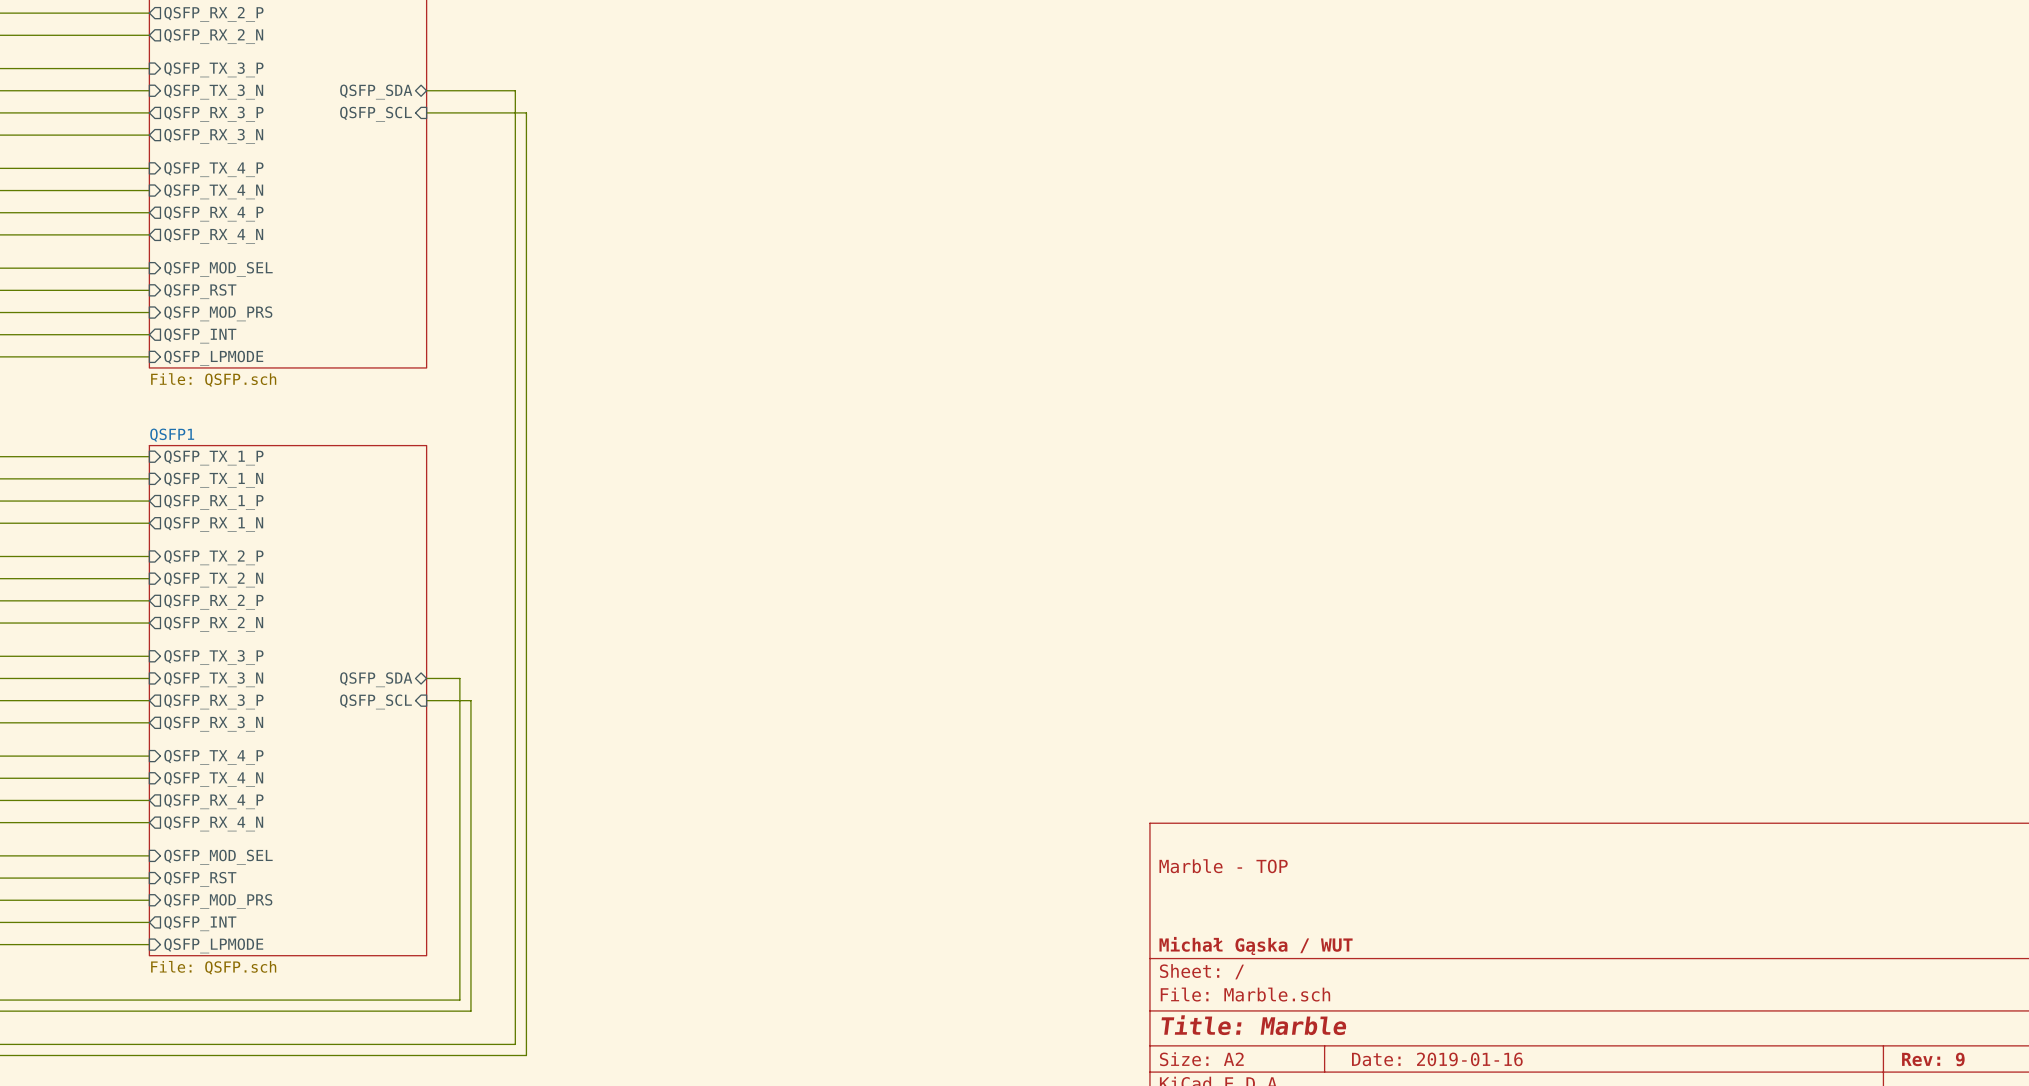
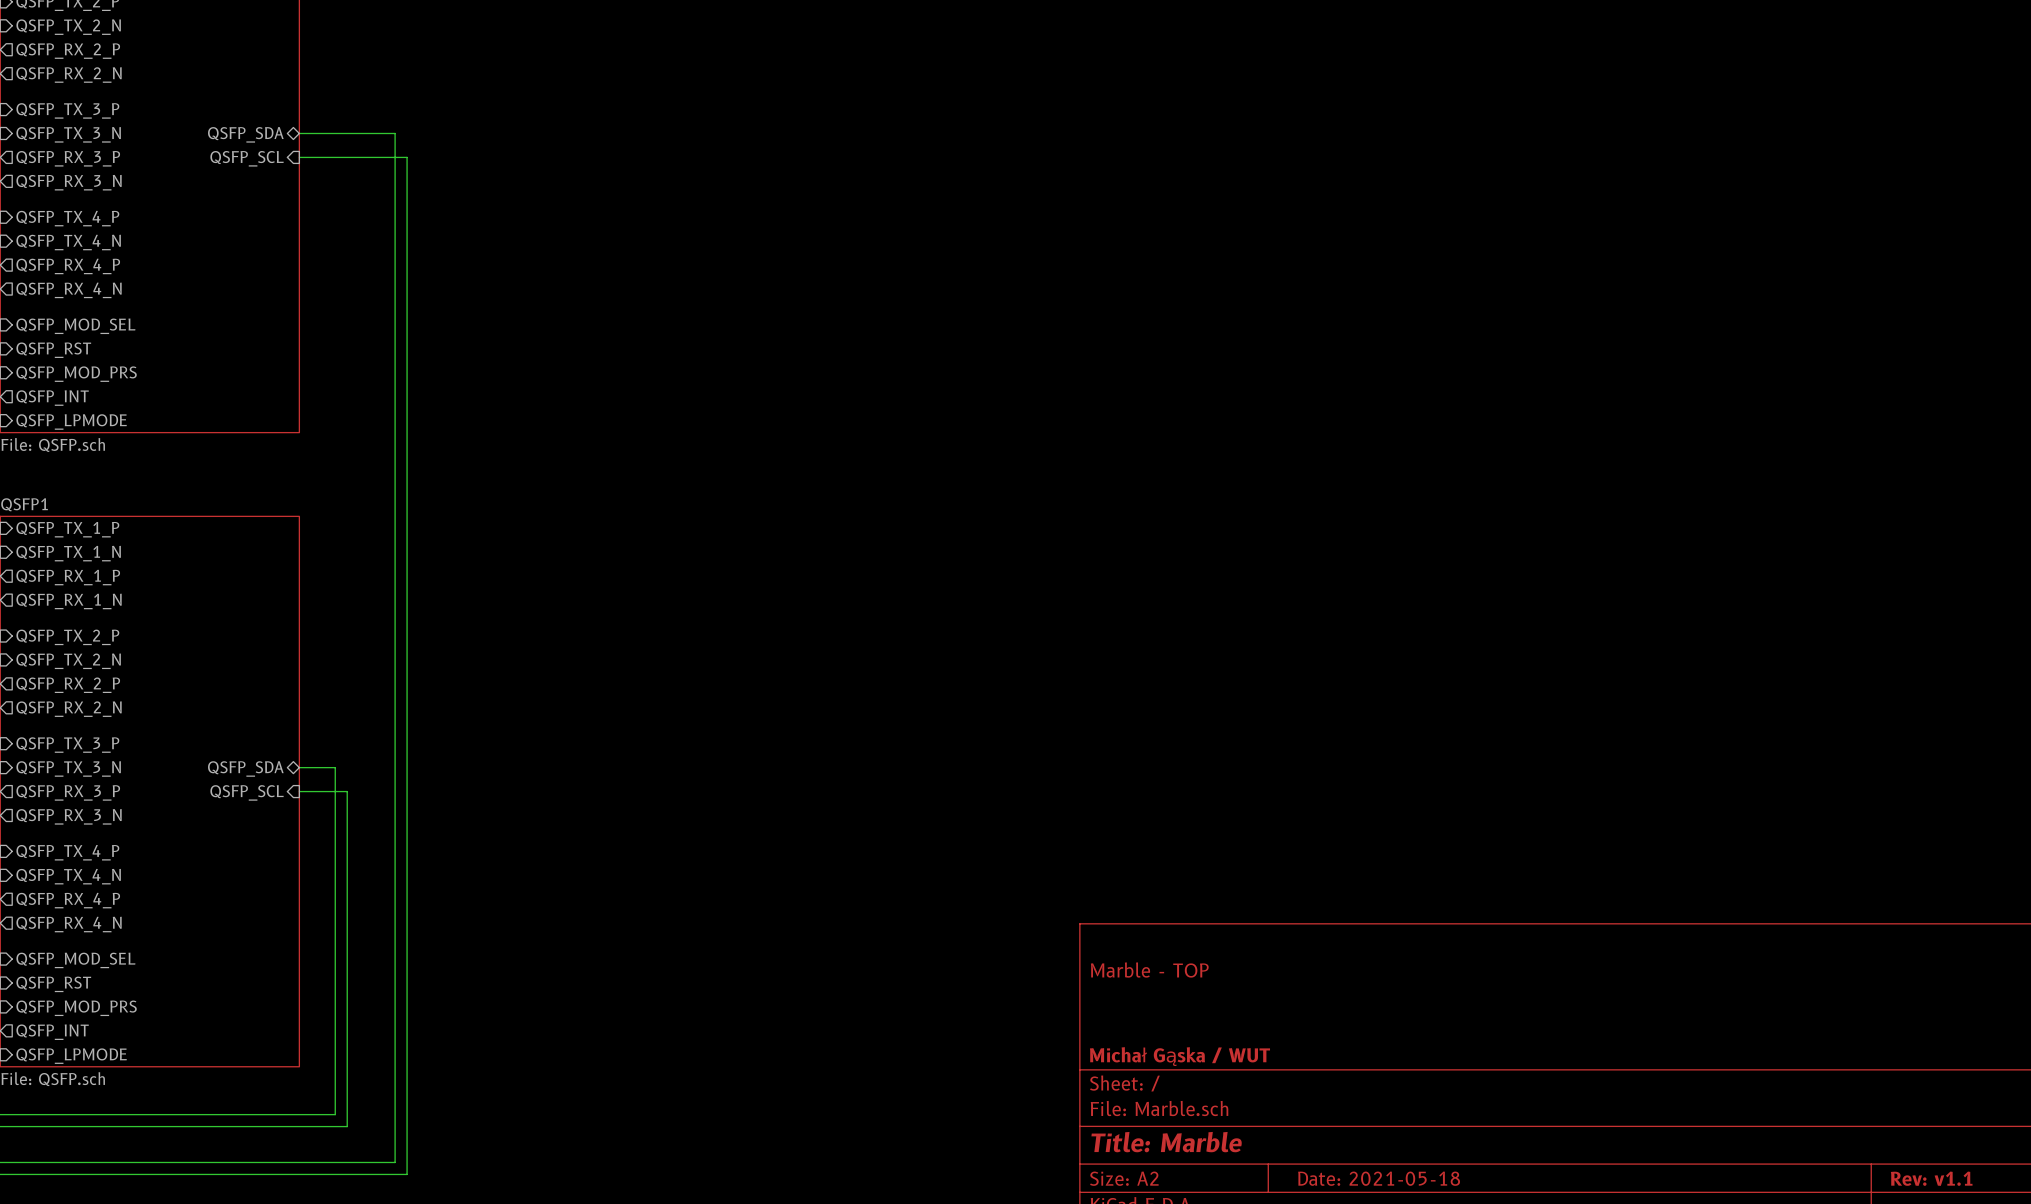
title block: Date: 2019-01-16 (1437, 1059) -> Date: 2021-05-18 (1379, 1178)
title block: Rev: 9 (1933, 1059) -> Rev: v1.1 (1931, 1178)

